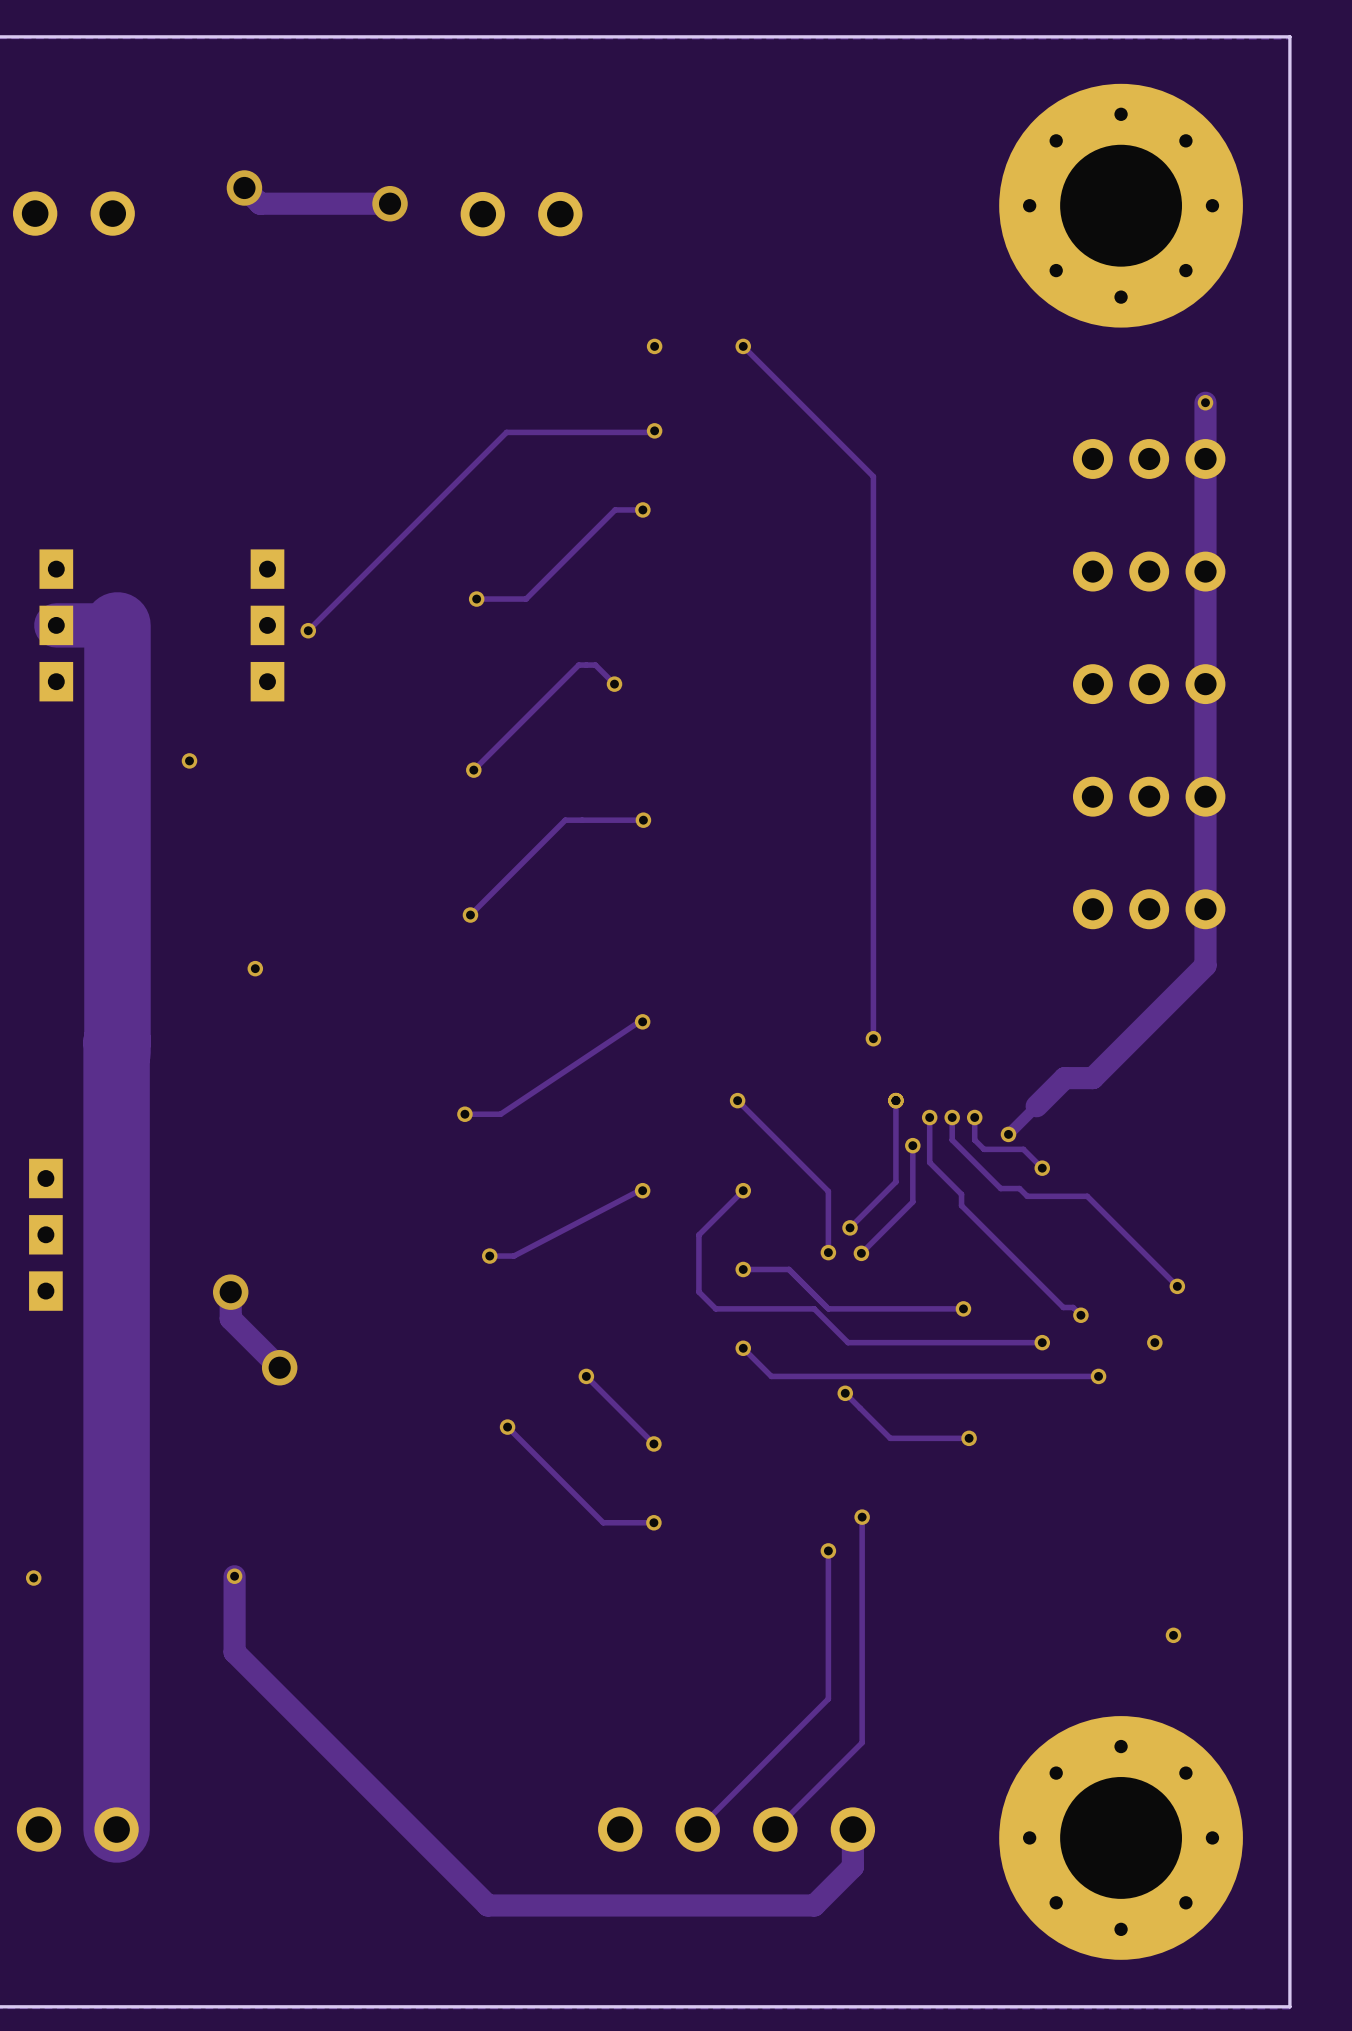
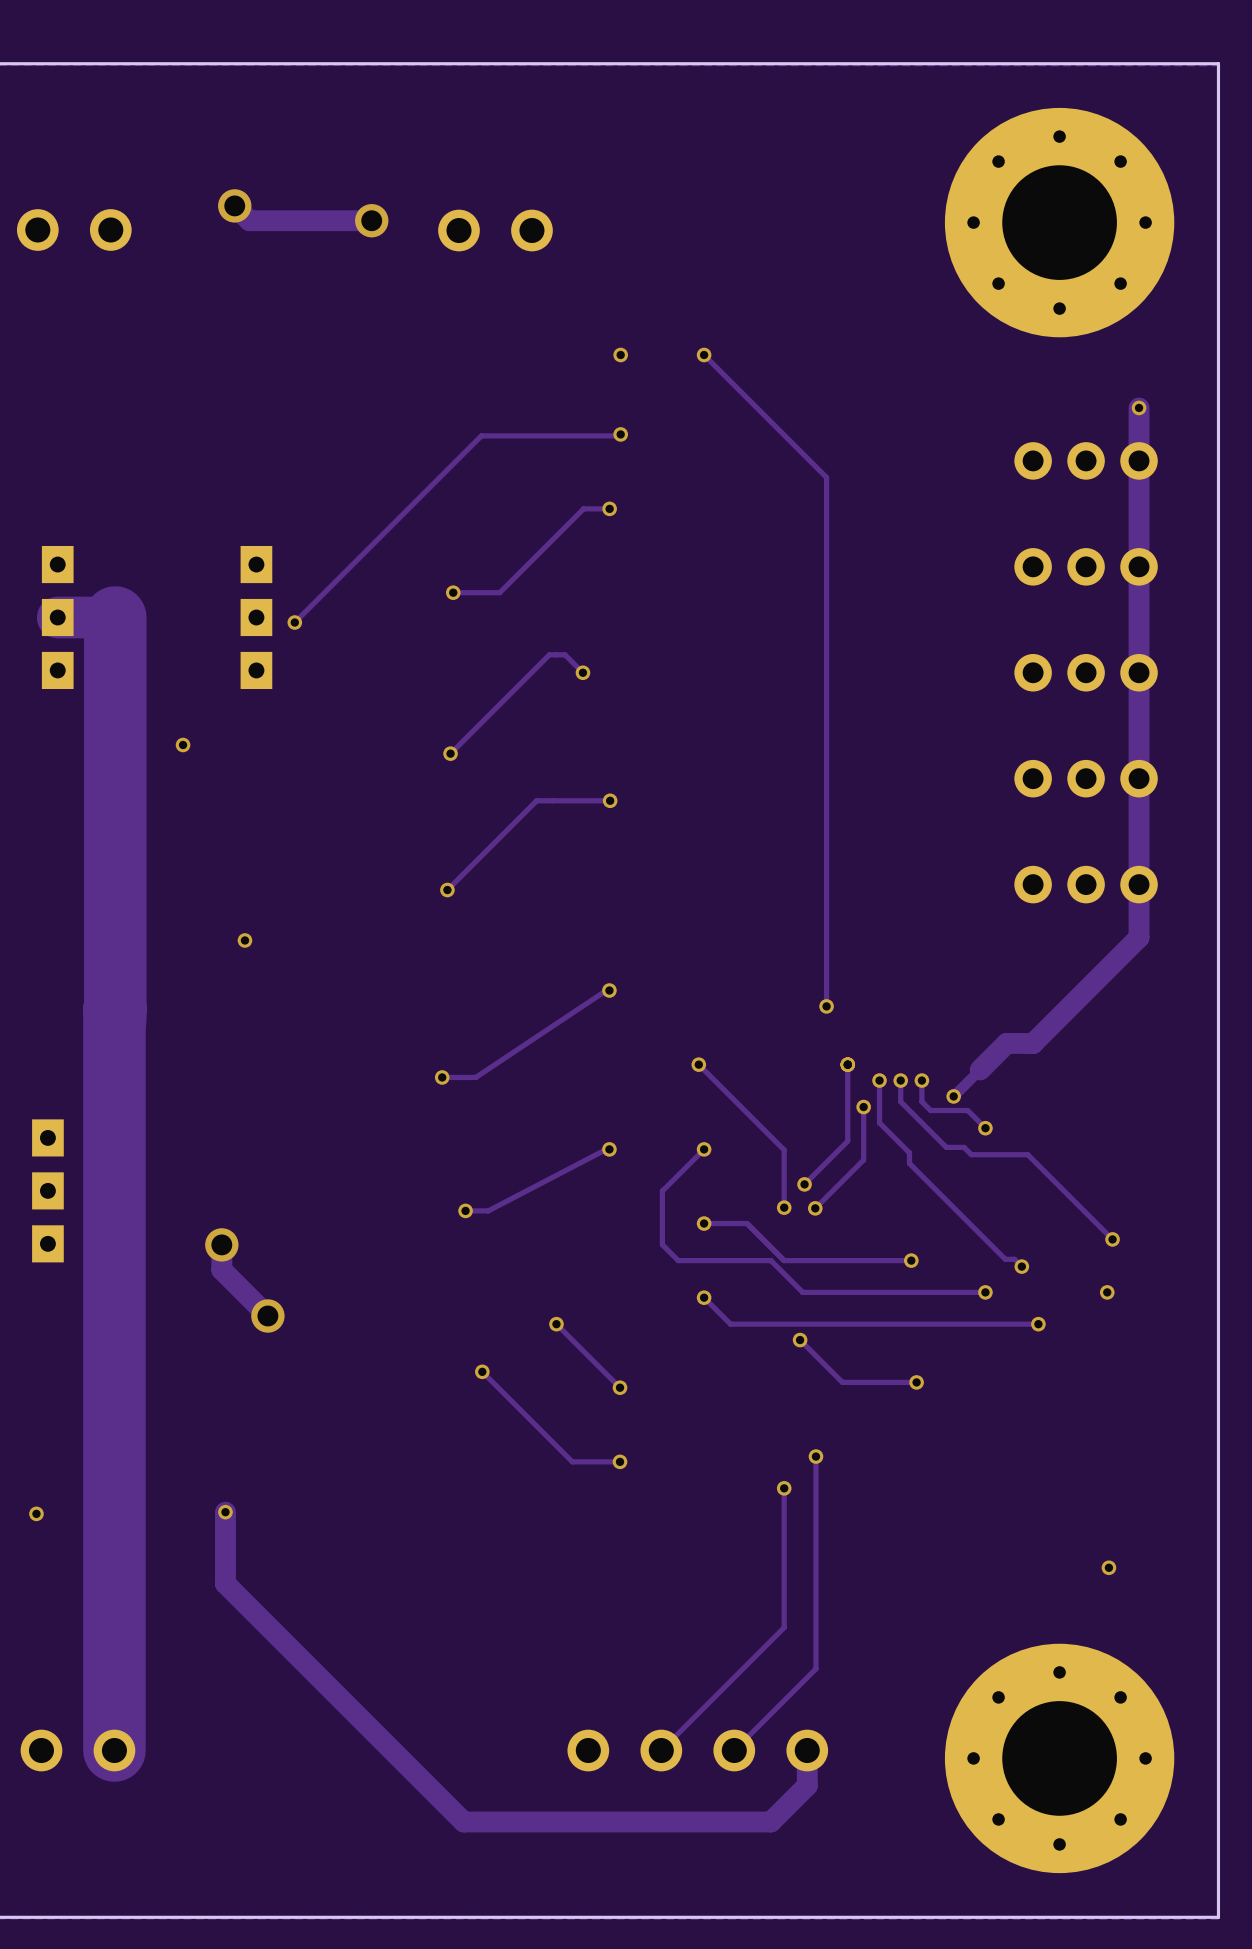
via position: (1154, 1342) -> (1107, 1292)

